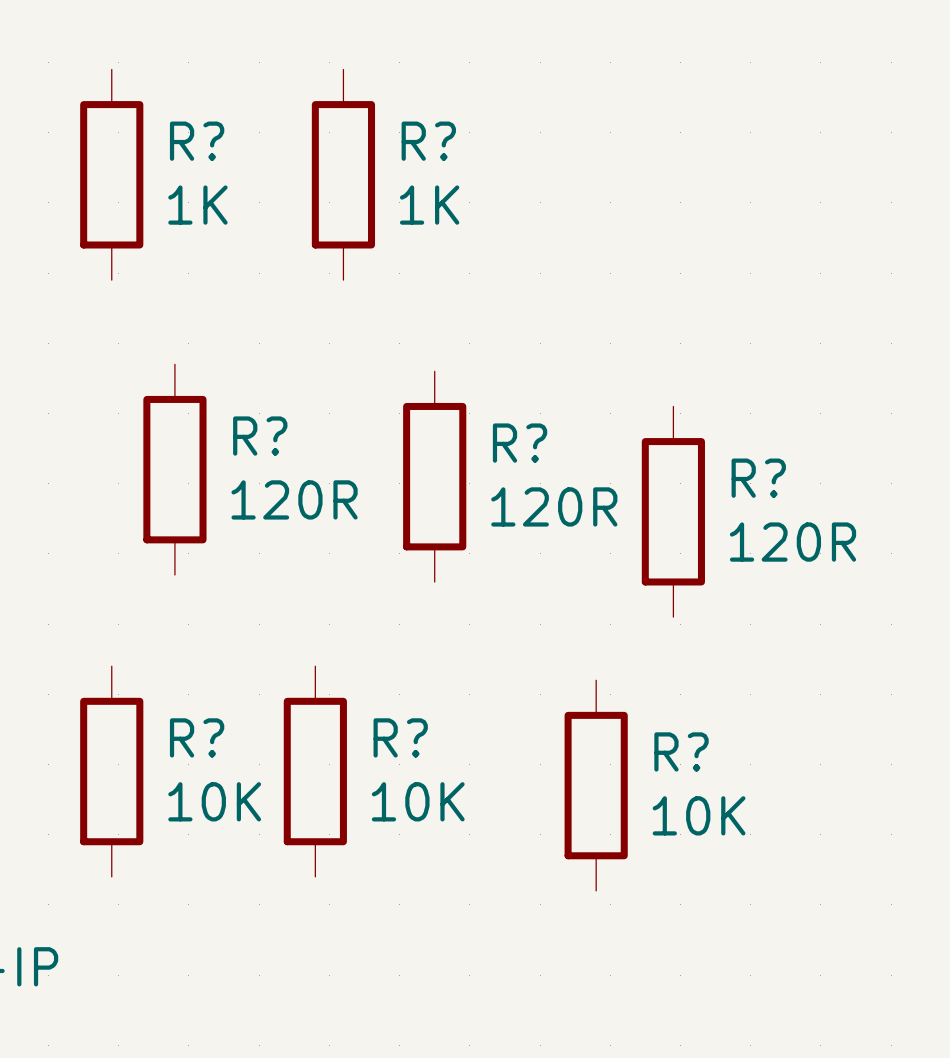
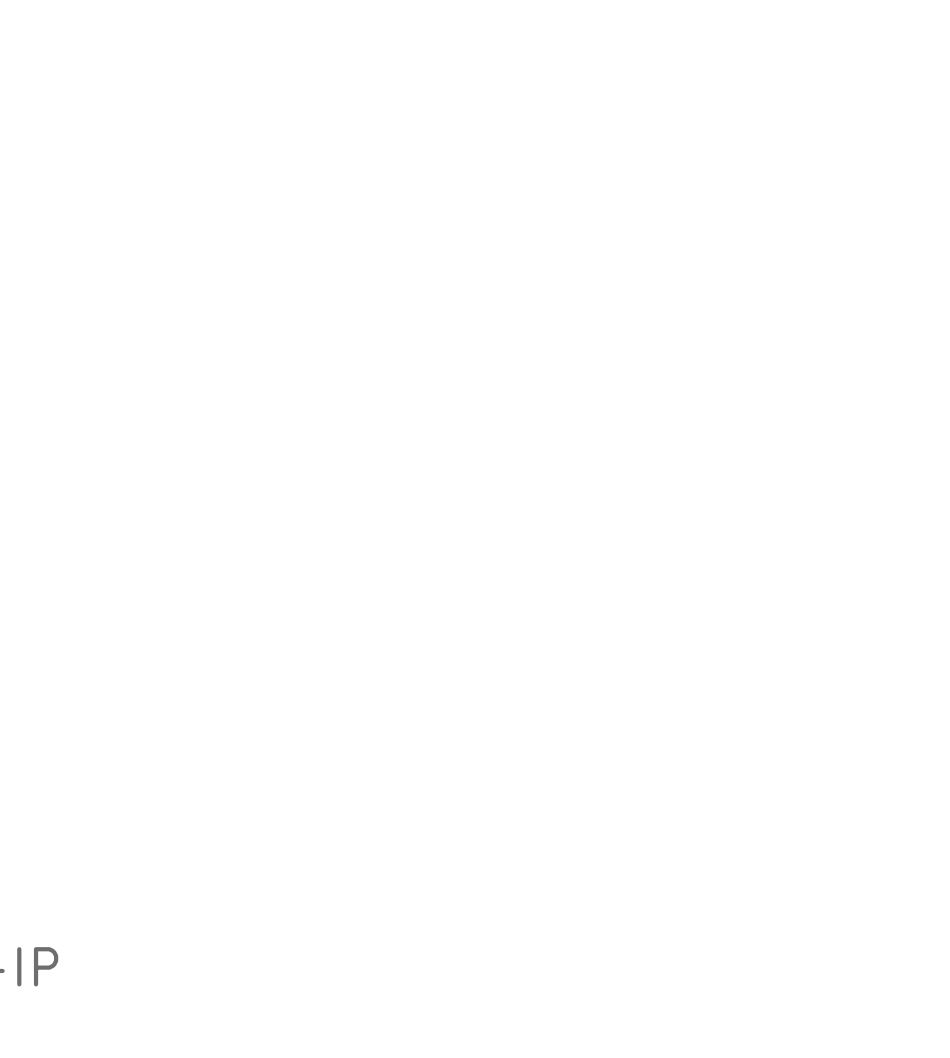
R?: 1K (111, 174) -> none
R?: 1K (343, 174) -> none
R?: 120R (174, 469) -> none
R?: 120R (434, 476) -> none
R?: 120R (673, 511) -> none
R?: 10K (111, 771) -> none
R?: 10K (315, 771) -> none
R?: 10K (596, 785) -> none

